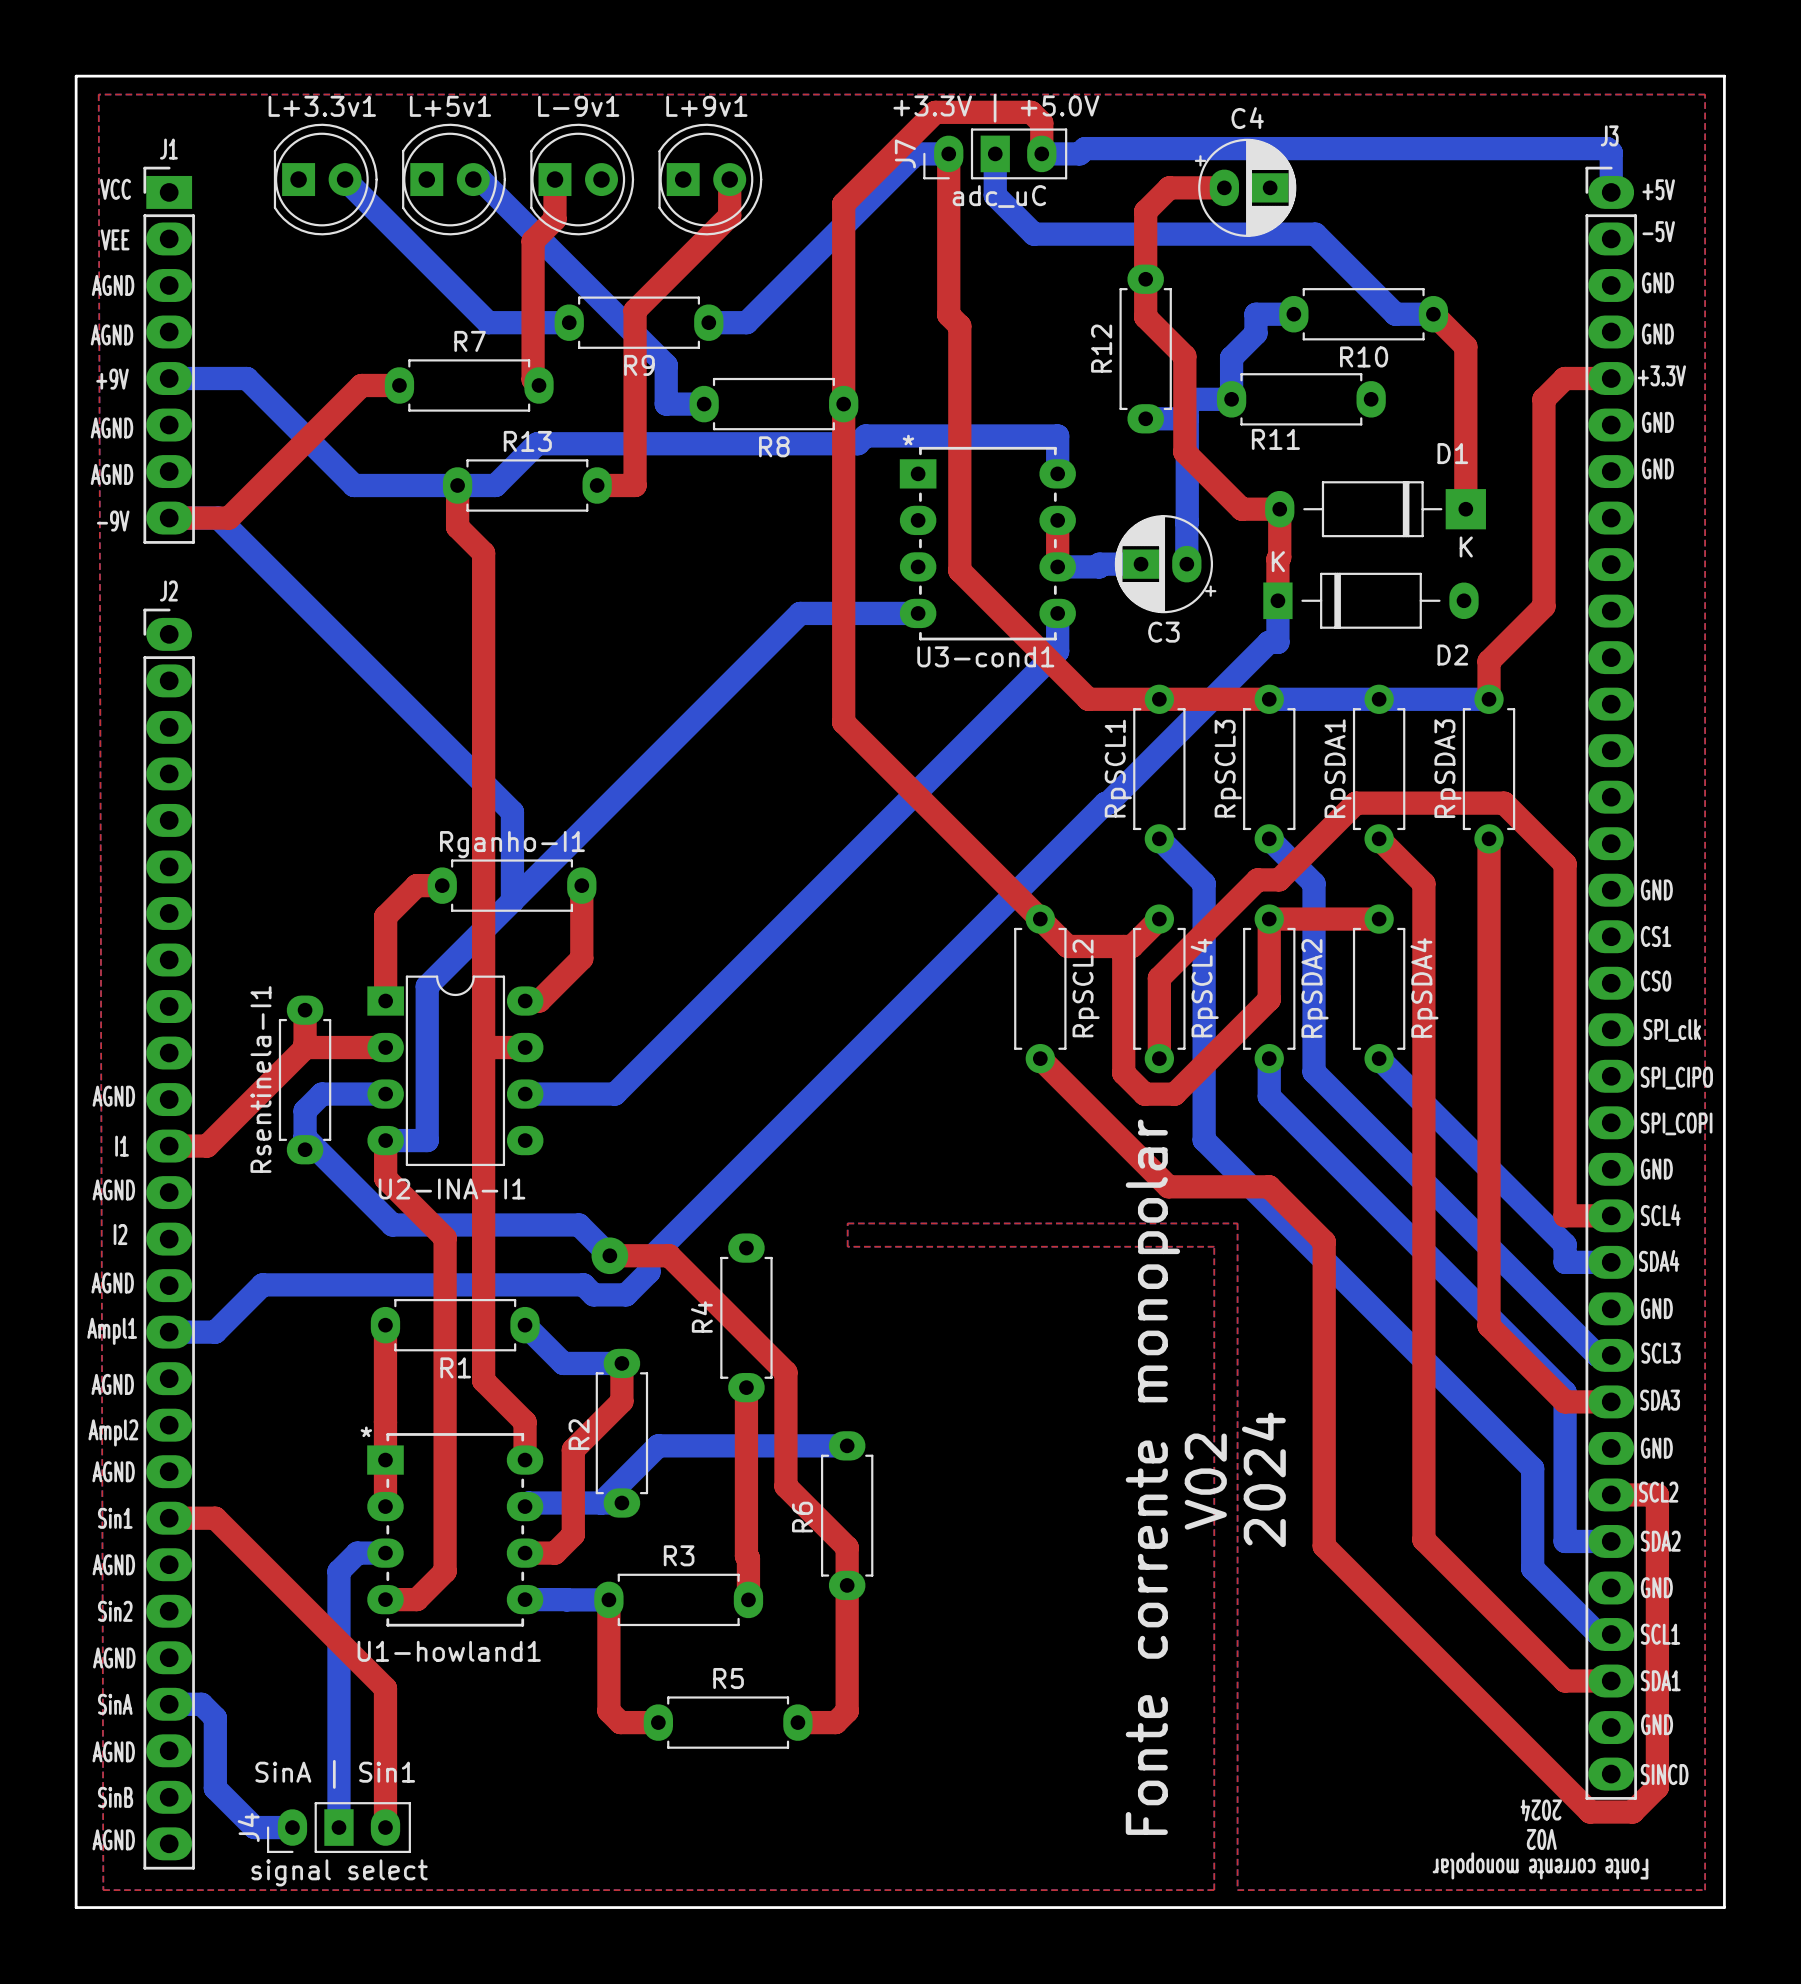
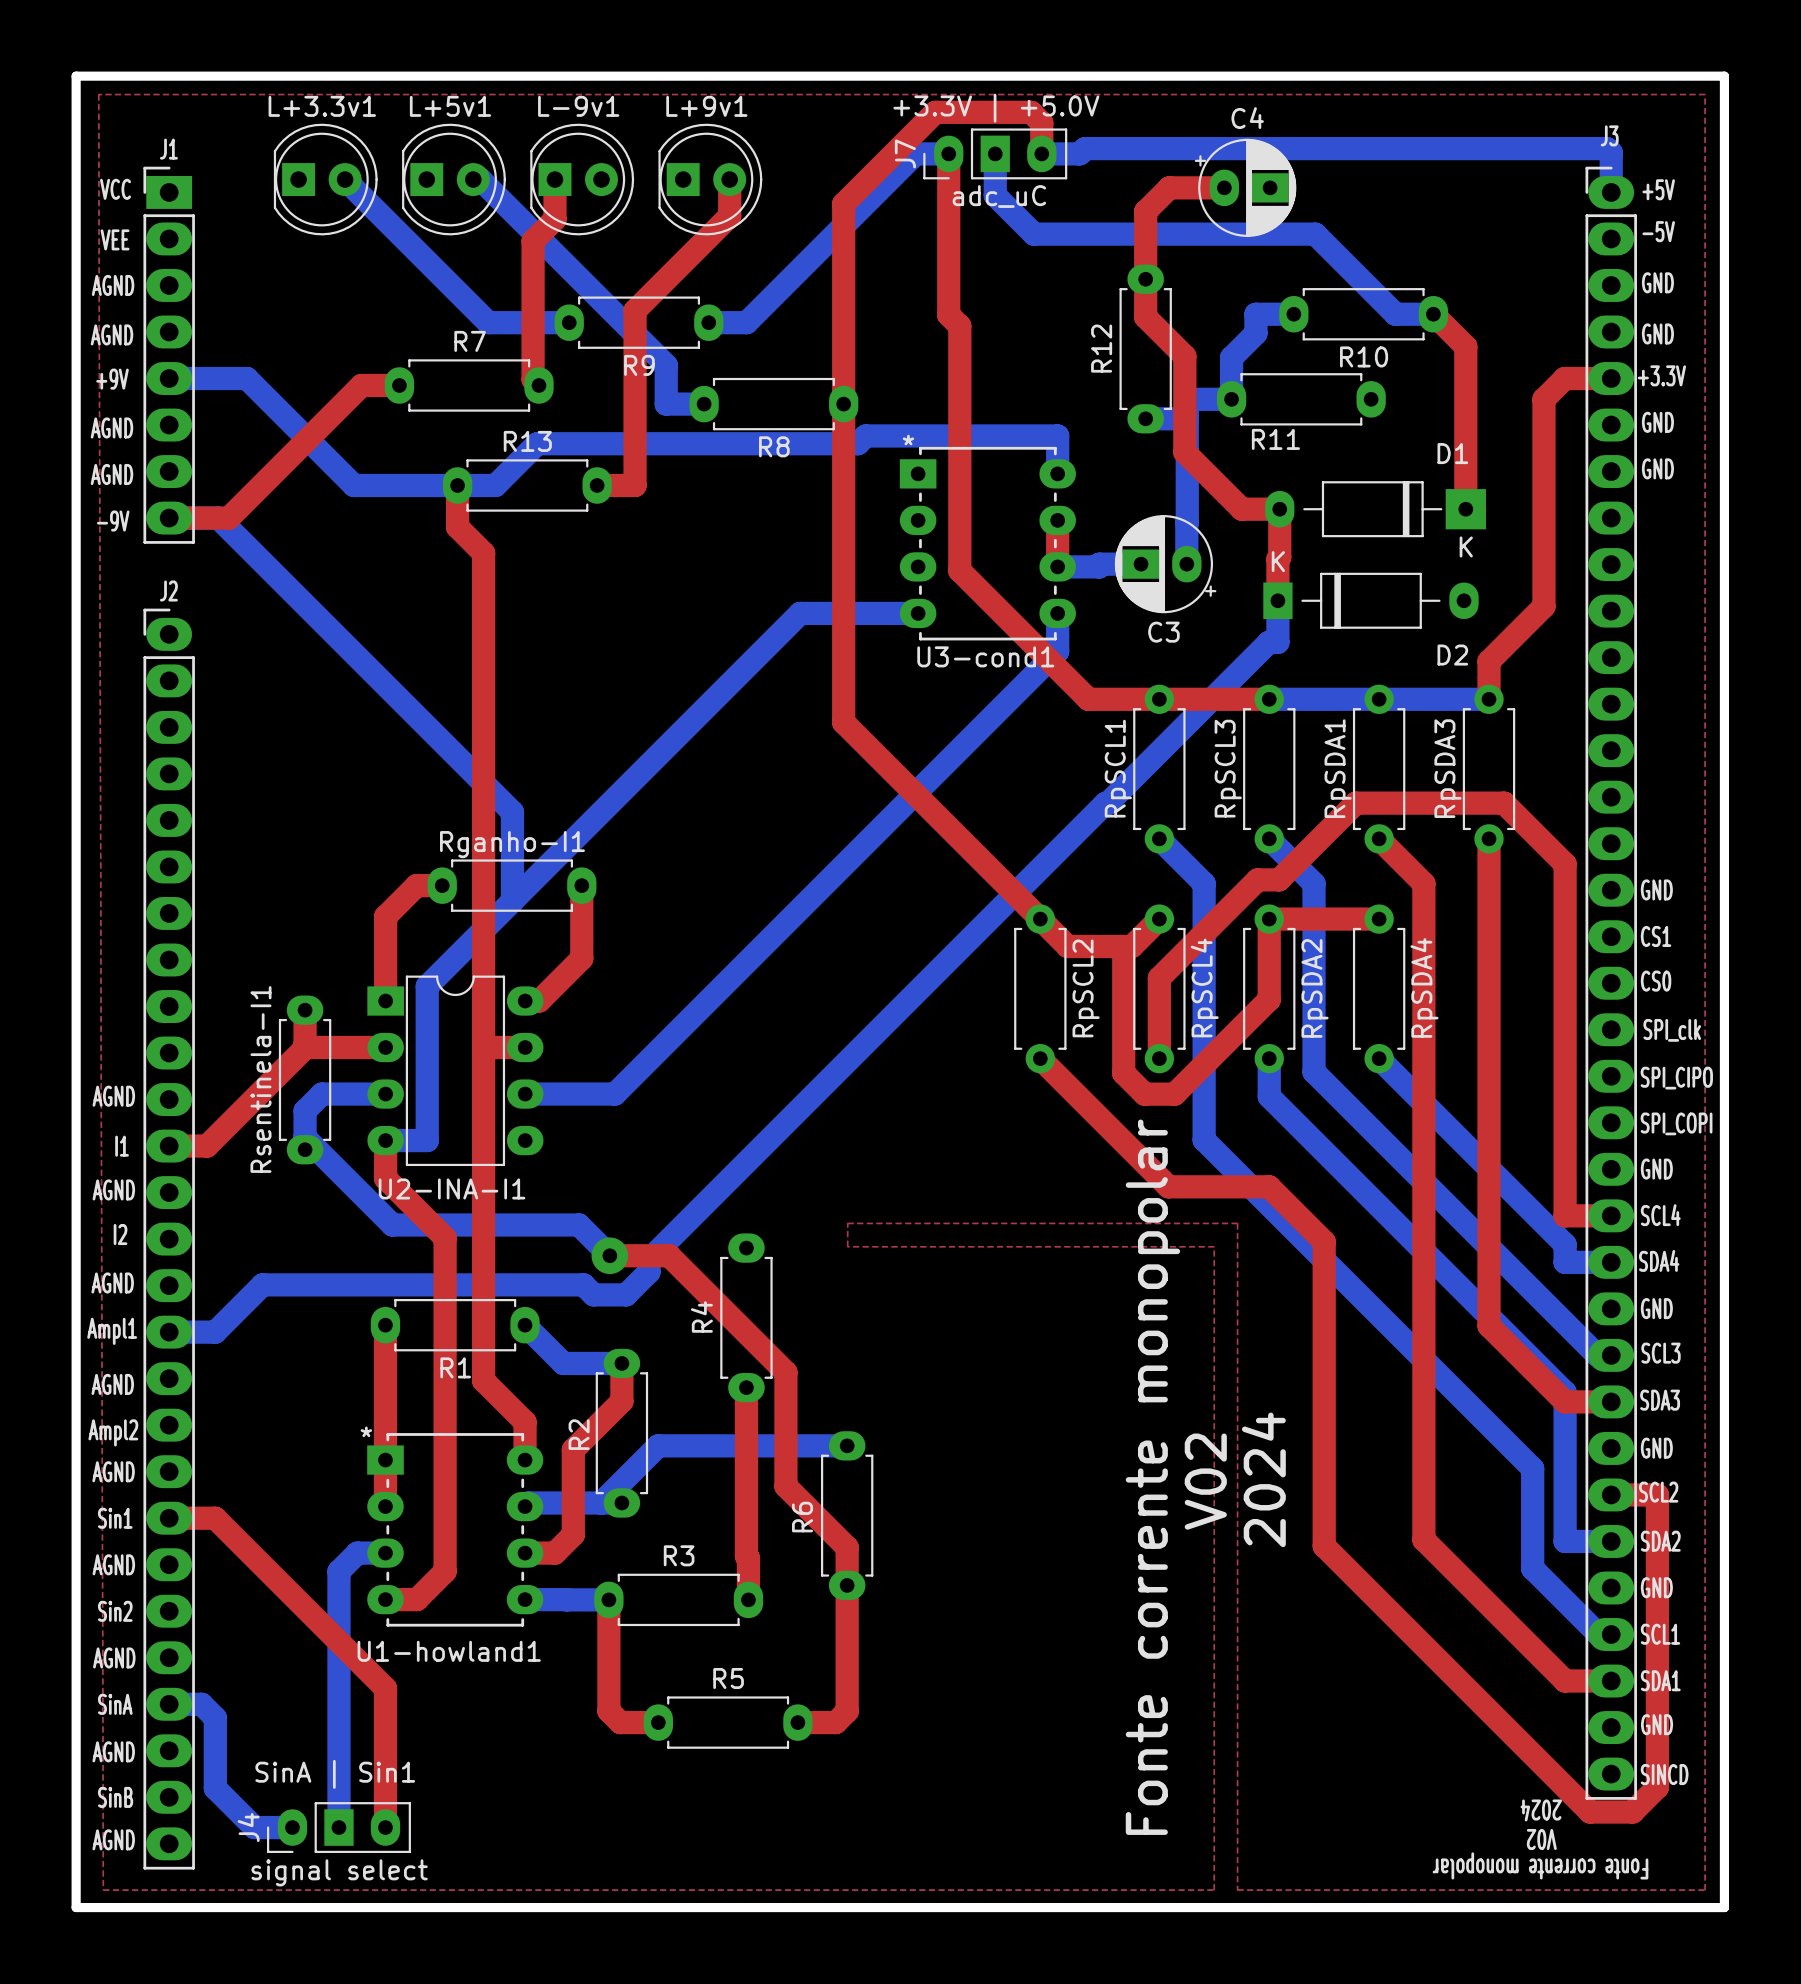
board edge width: thin (76, 76) (76, 1907) (1724, 1907) (1724, 76) (76, 76) -> thick (76, 76) (76, 1907) (1724, 1907) (1724, 76) (76, 76)

